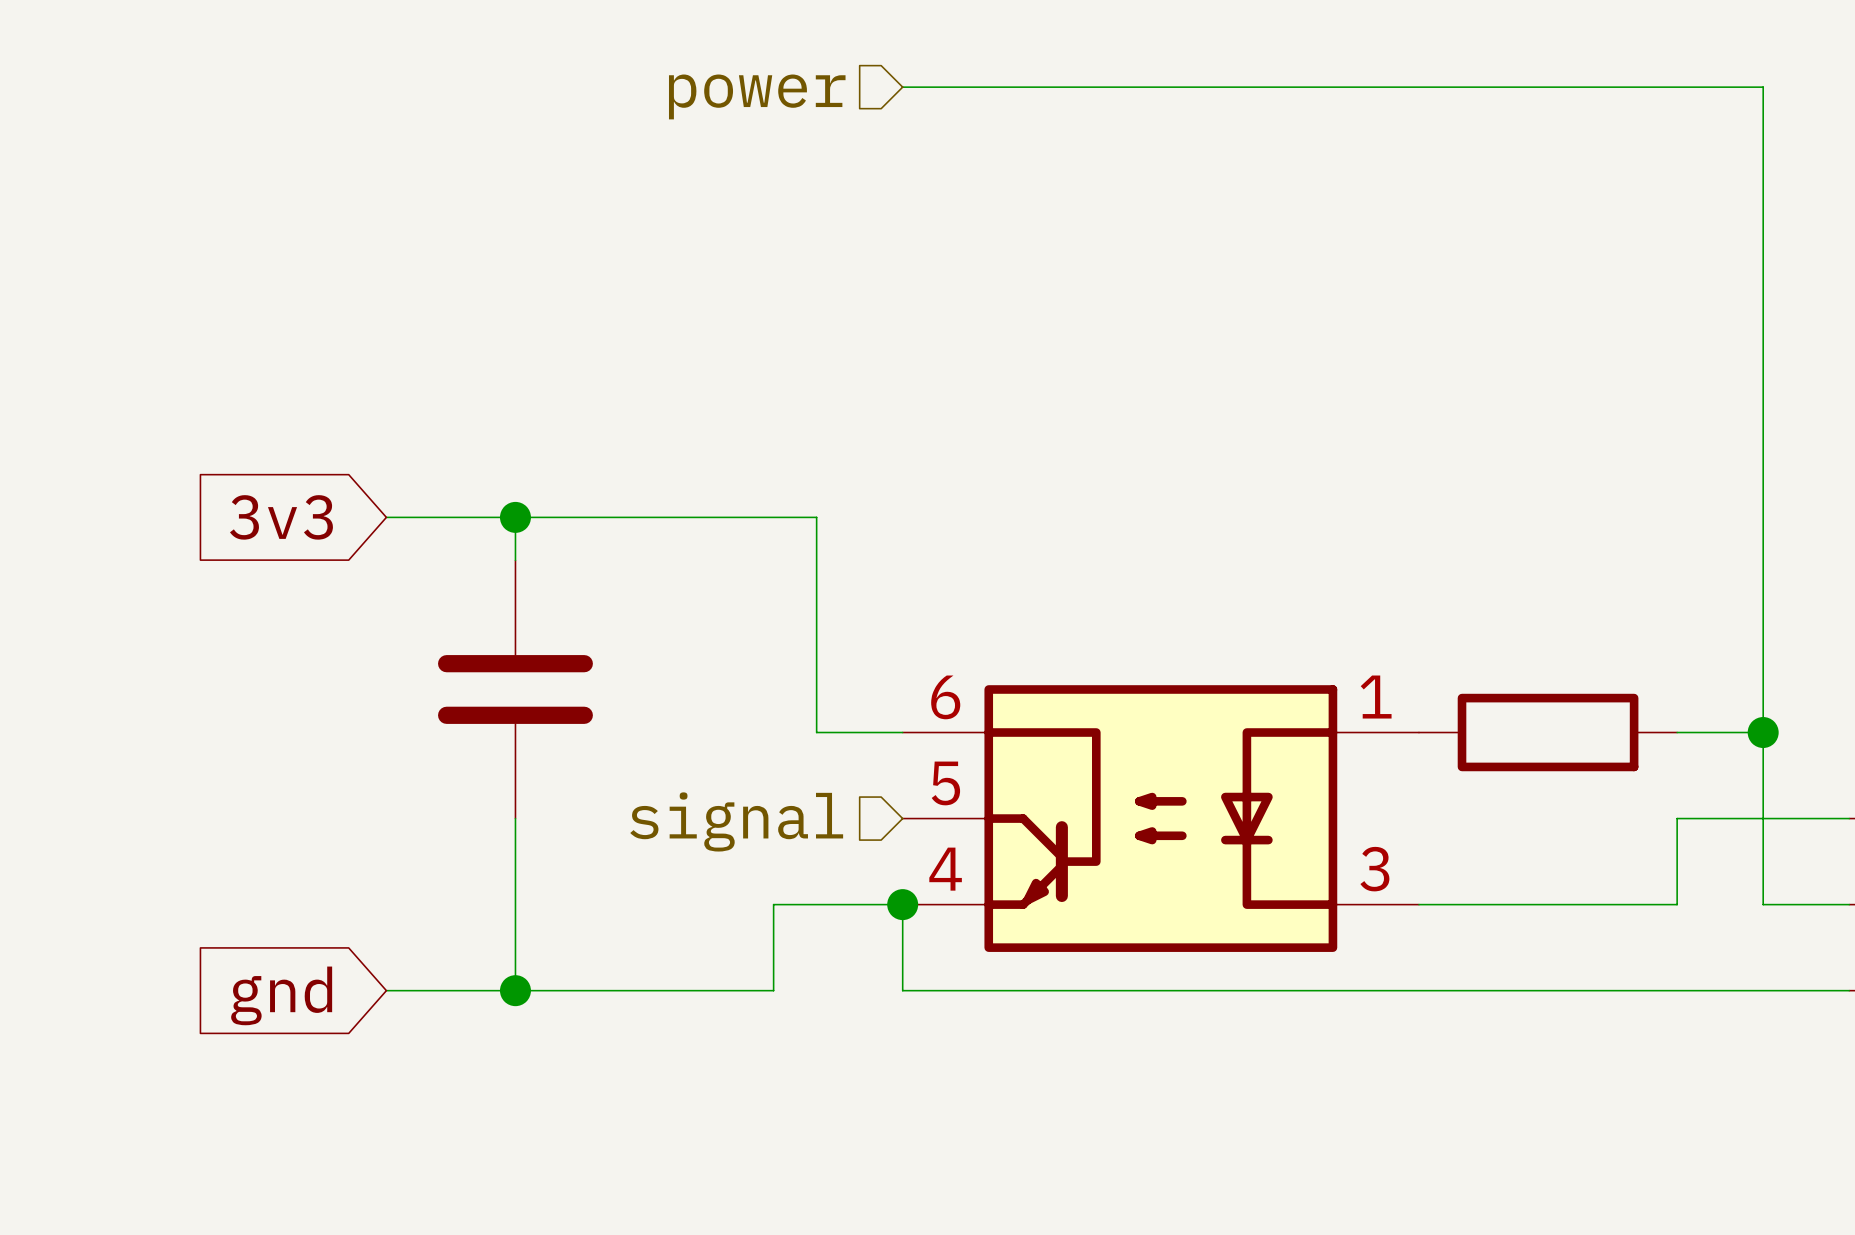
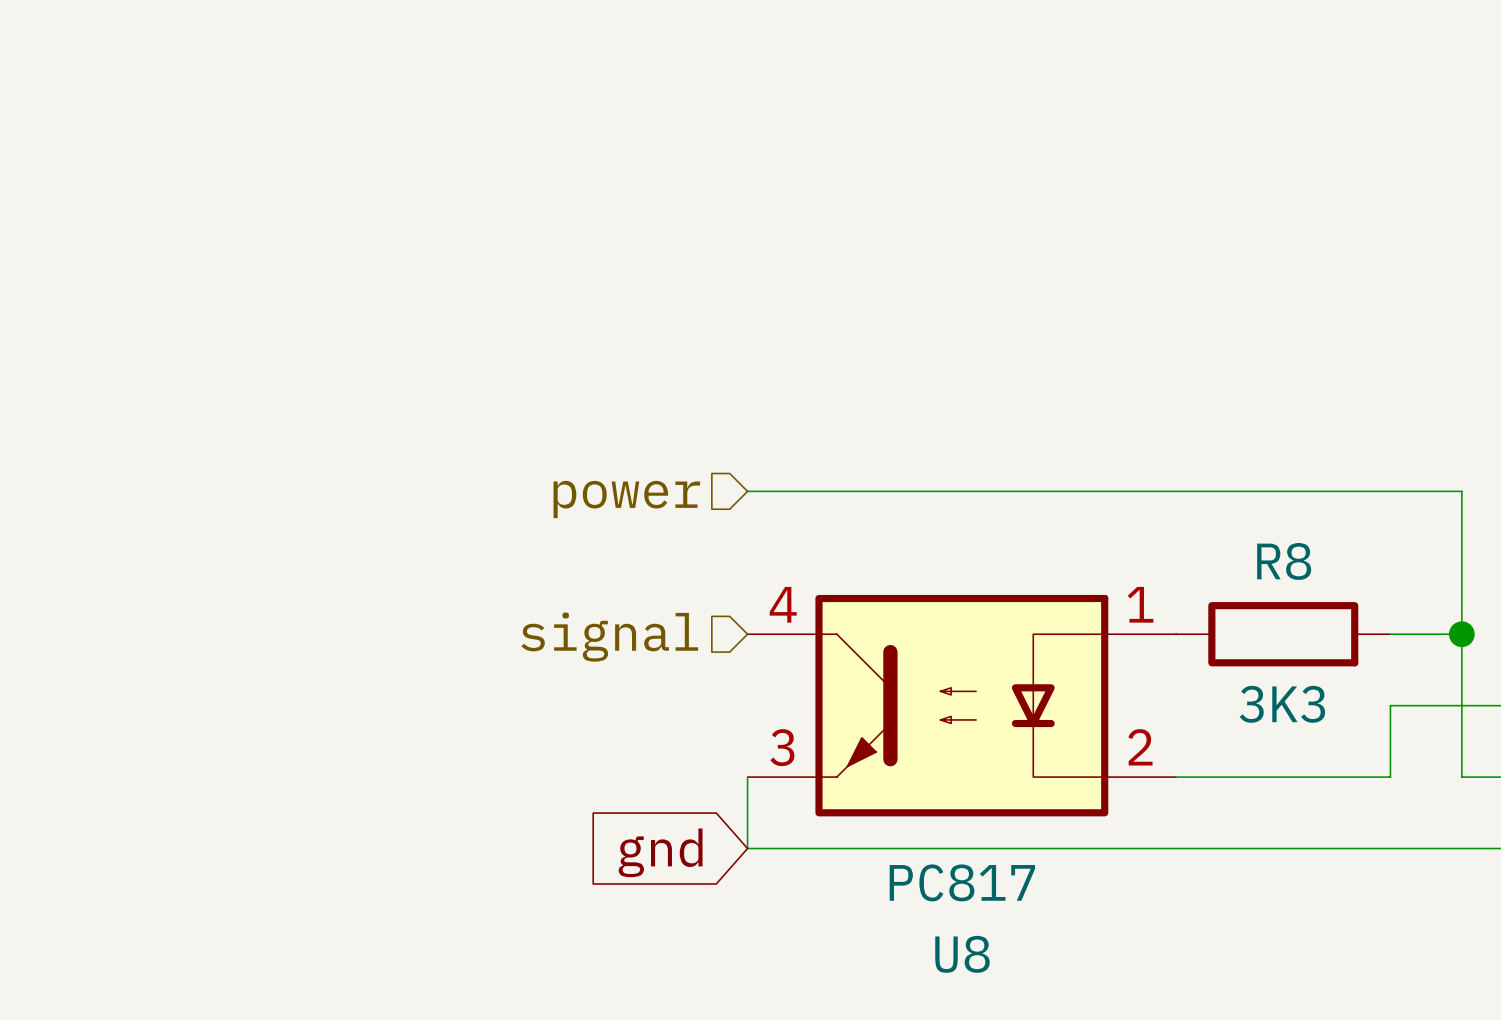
wire: (902, 87) (1763, 87) (1763, 560) -> (747, 491) (1461, 491)
hierarchical label position: power (757, 96) -> power (626, 499)
global label: 3v3 (281, 517) -> none
wire: (386, 517) (816, 517) (816, 732) (902, 732) -> none
wire: (515, 517) (515, 560) -> none
junction: (515, 517) -> none
R8 name: none -> R8 (1284, 561)
part: (515, 689) -> none
R8 value: none -> 3K3 (1282, 704)
wire: (515, 818) (515, 990) -> none
part: (1160, 818) -> none
U8: none -> PC817 (961, 705)
hierarchical label position: signal (736, 821) -> signal (609, 637)
wire: (902, 904) (773, 904) (773, 990) (386, 990) -> none
junction: (902, 904) -> none
junction: (515, 990) -> none
global label position: gnd (281, 995) -> gnd (660, 852)

